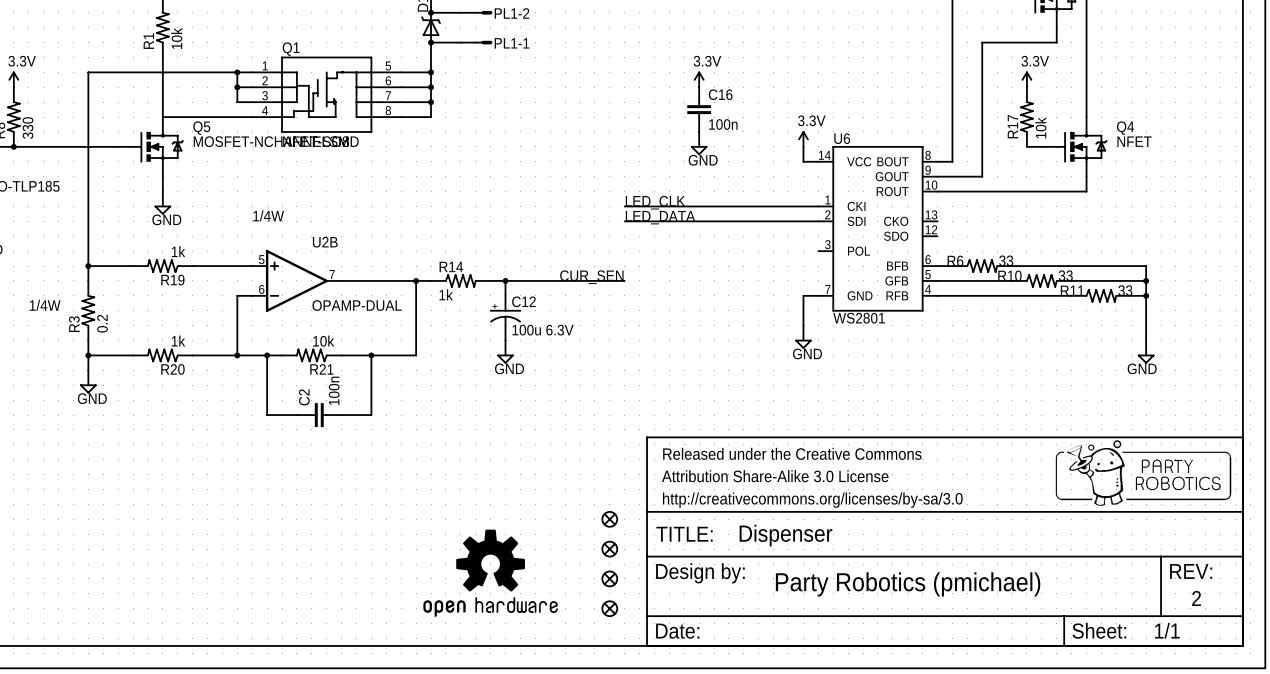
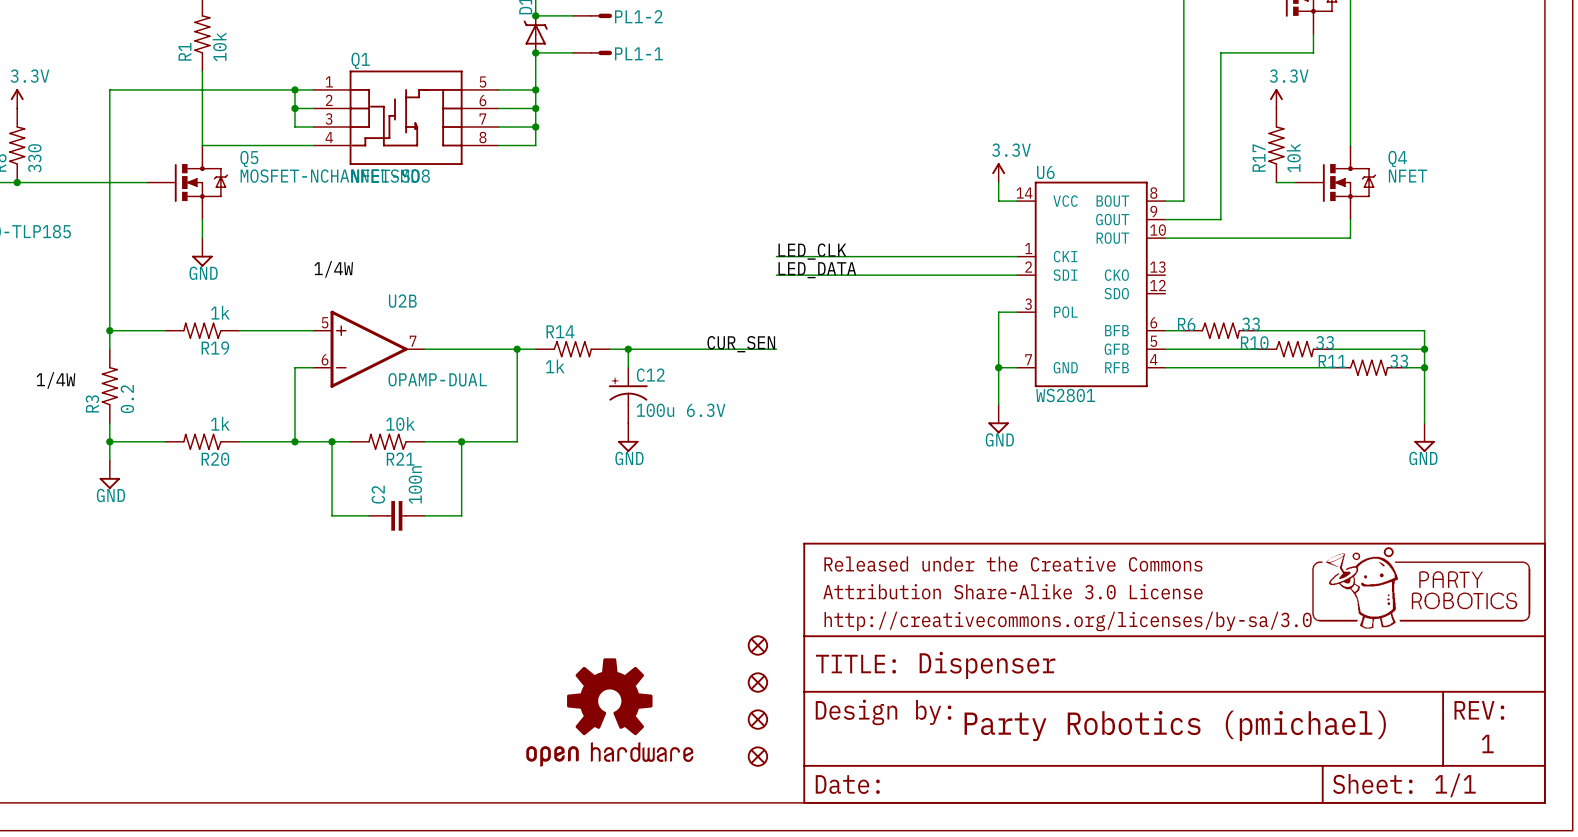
power symbol: 3.3V (699, 79) -> none
C16: 100n (699, 109) -> none
power symbol: GND (699, 143) -> none
wire: none -> (1017, 312) (998, 312) (998, 367)
junction: none -> (998, 367)
text: 2 (1196, 598) -> 1 (1487, 744)

